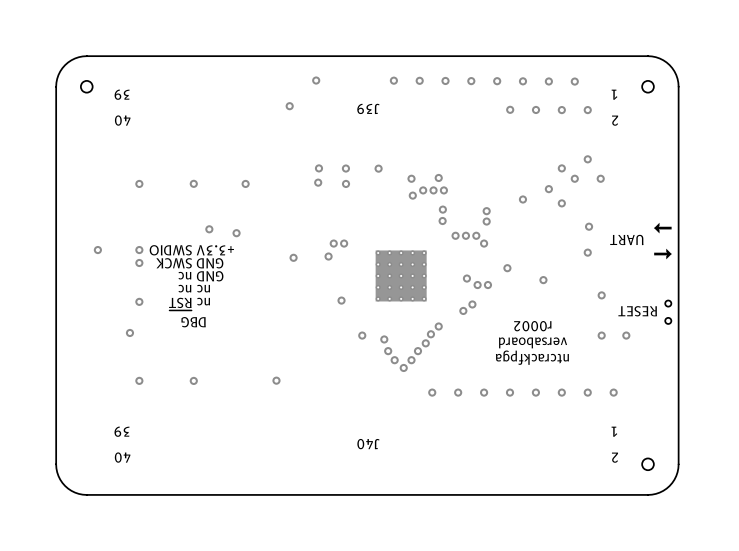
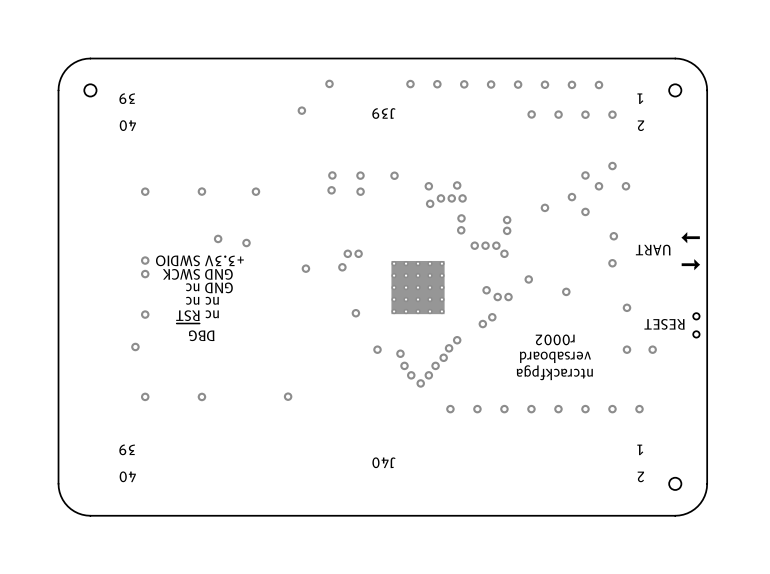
via: (97, 250) -> none

